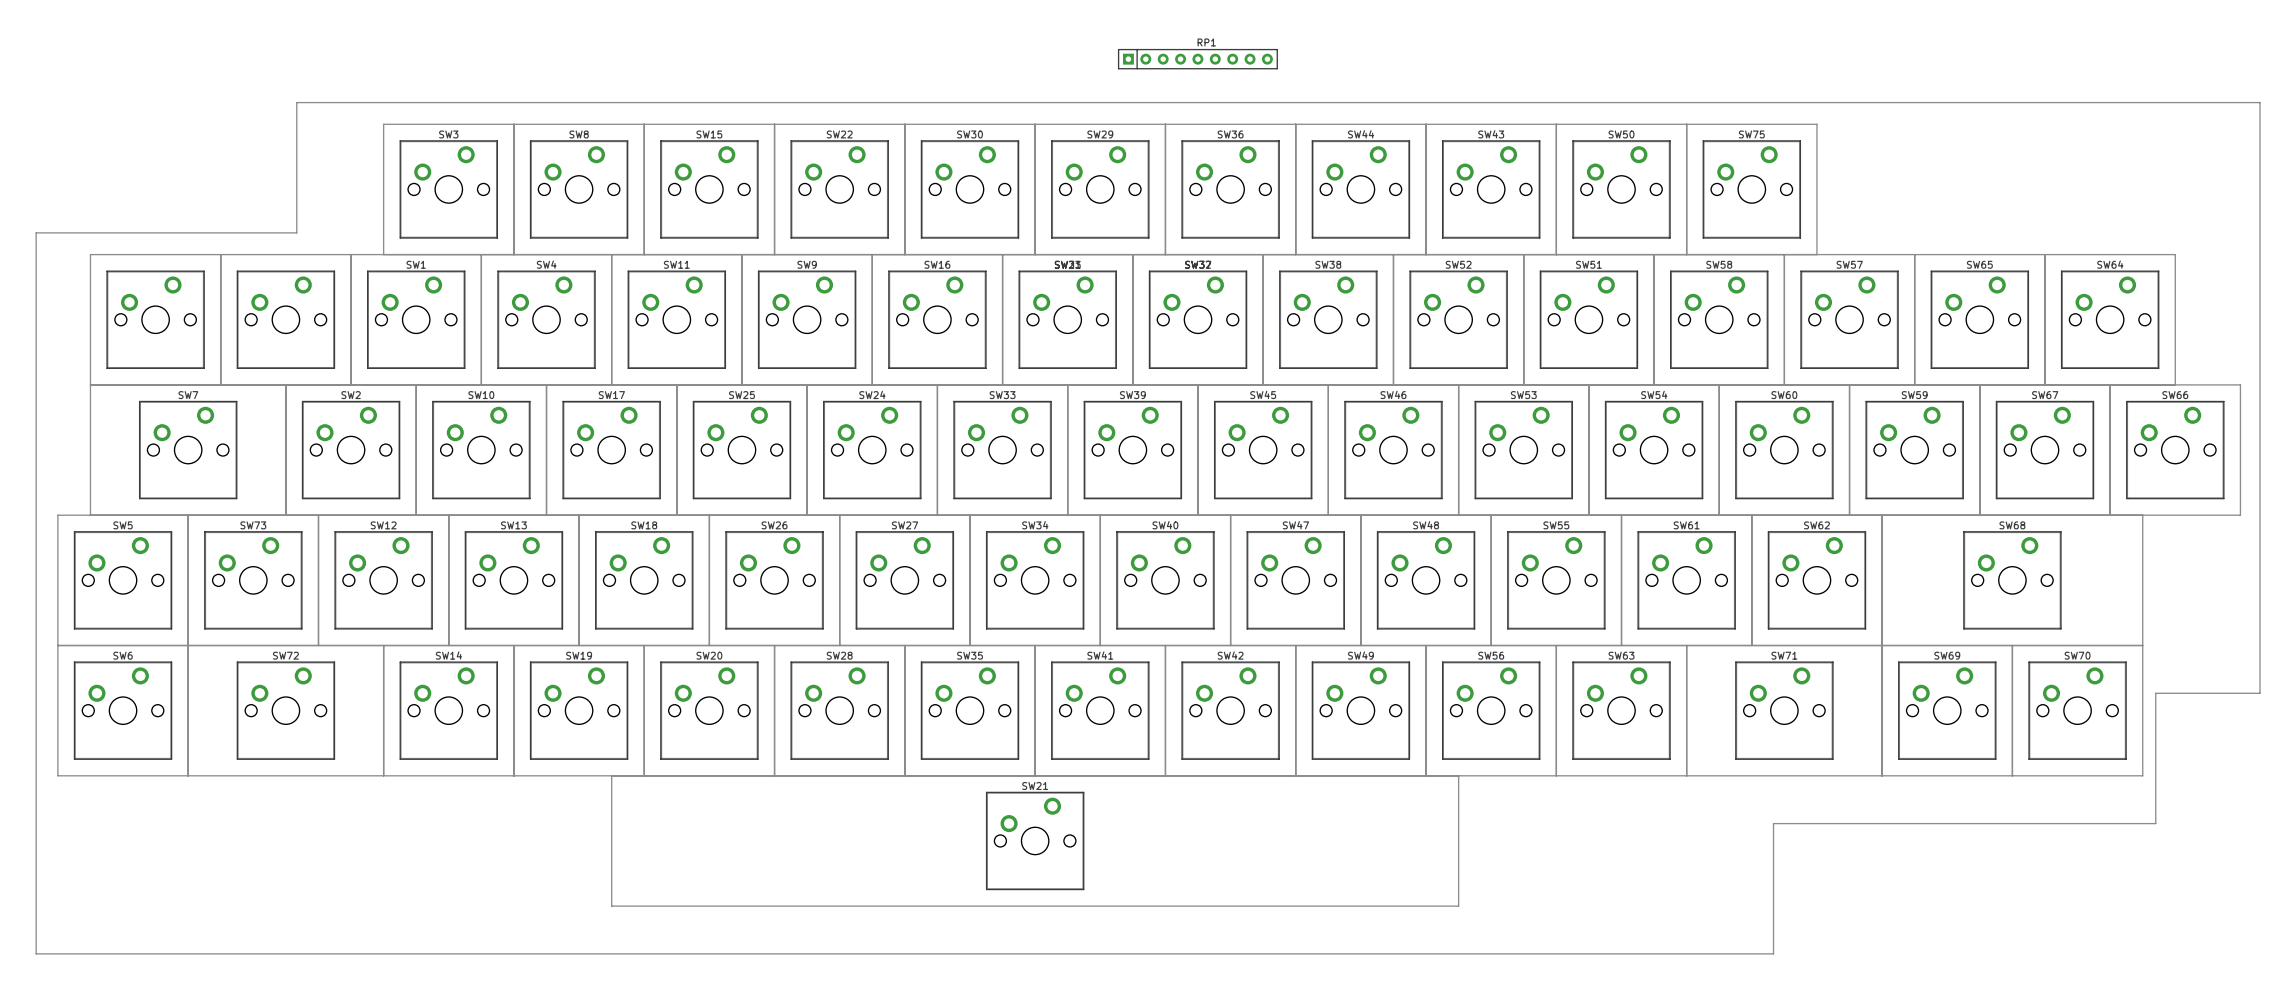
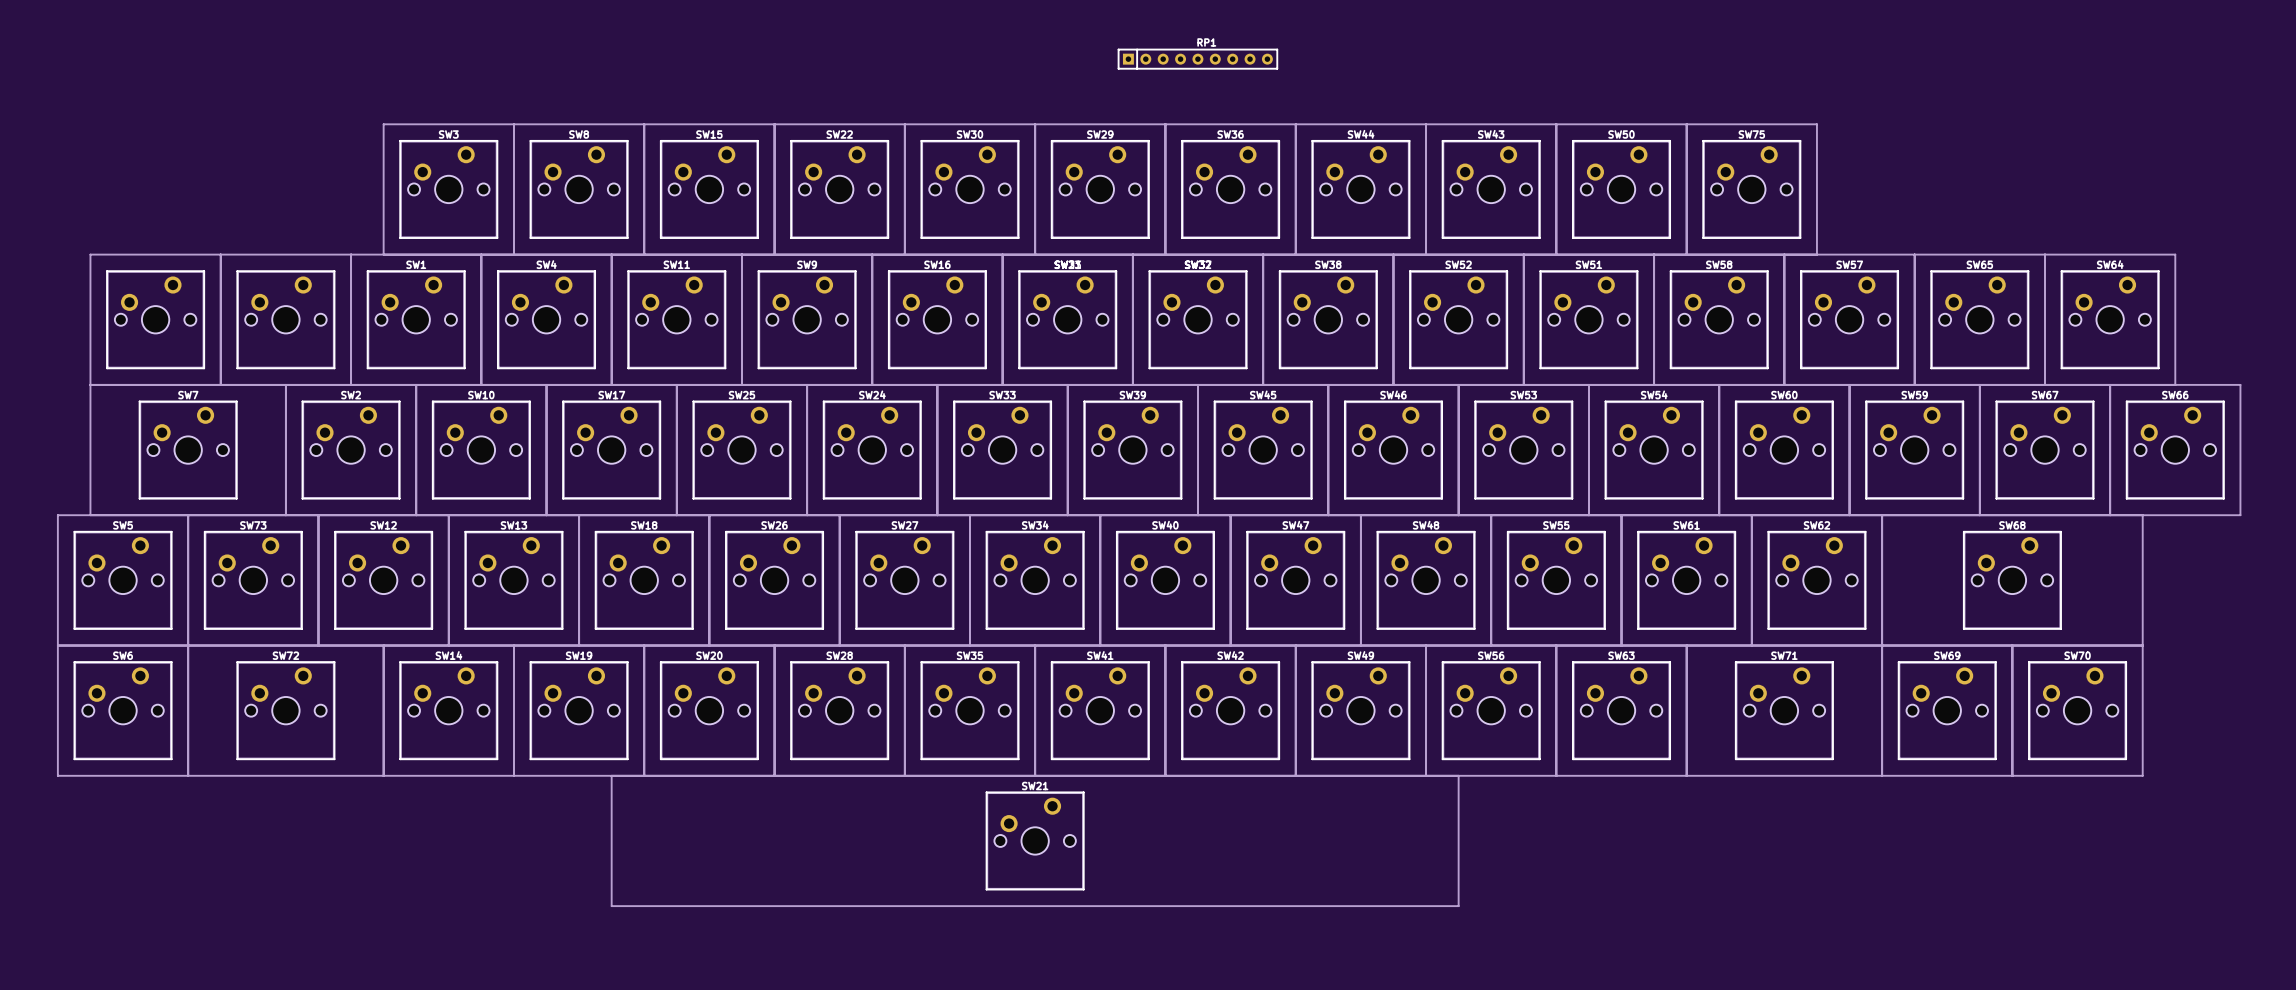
line: (296, 102) (296, 232) (36, 232) (36, 953) (1773, 953) (1773, 823) (2155, 823) (2155, 693) (2259, 693) (2259, 102) (296, 102) -> none

